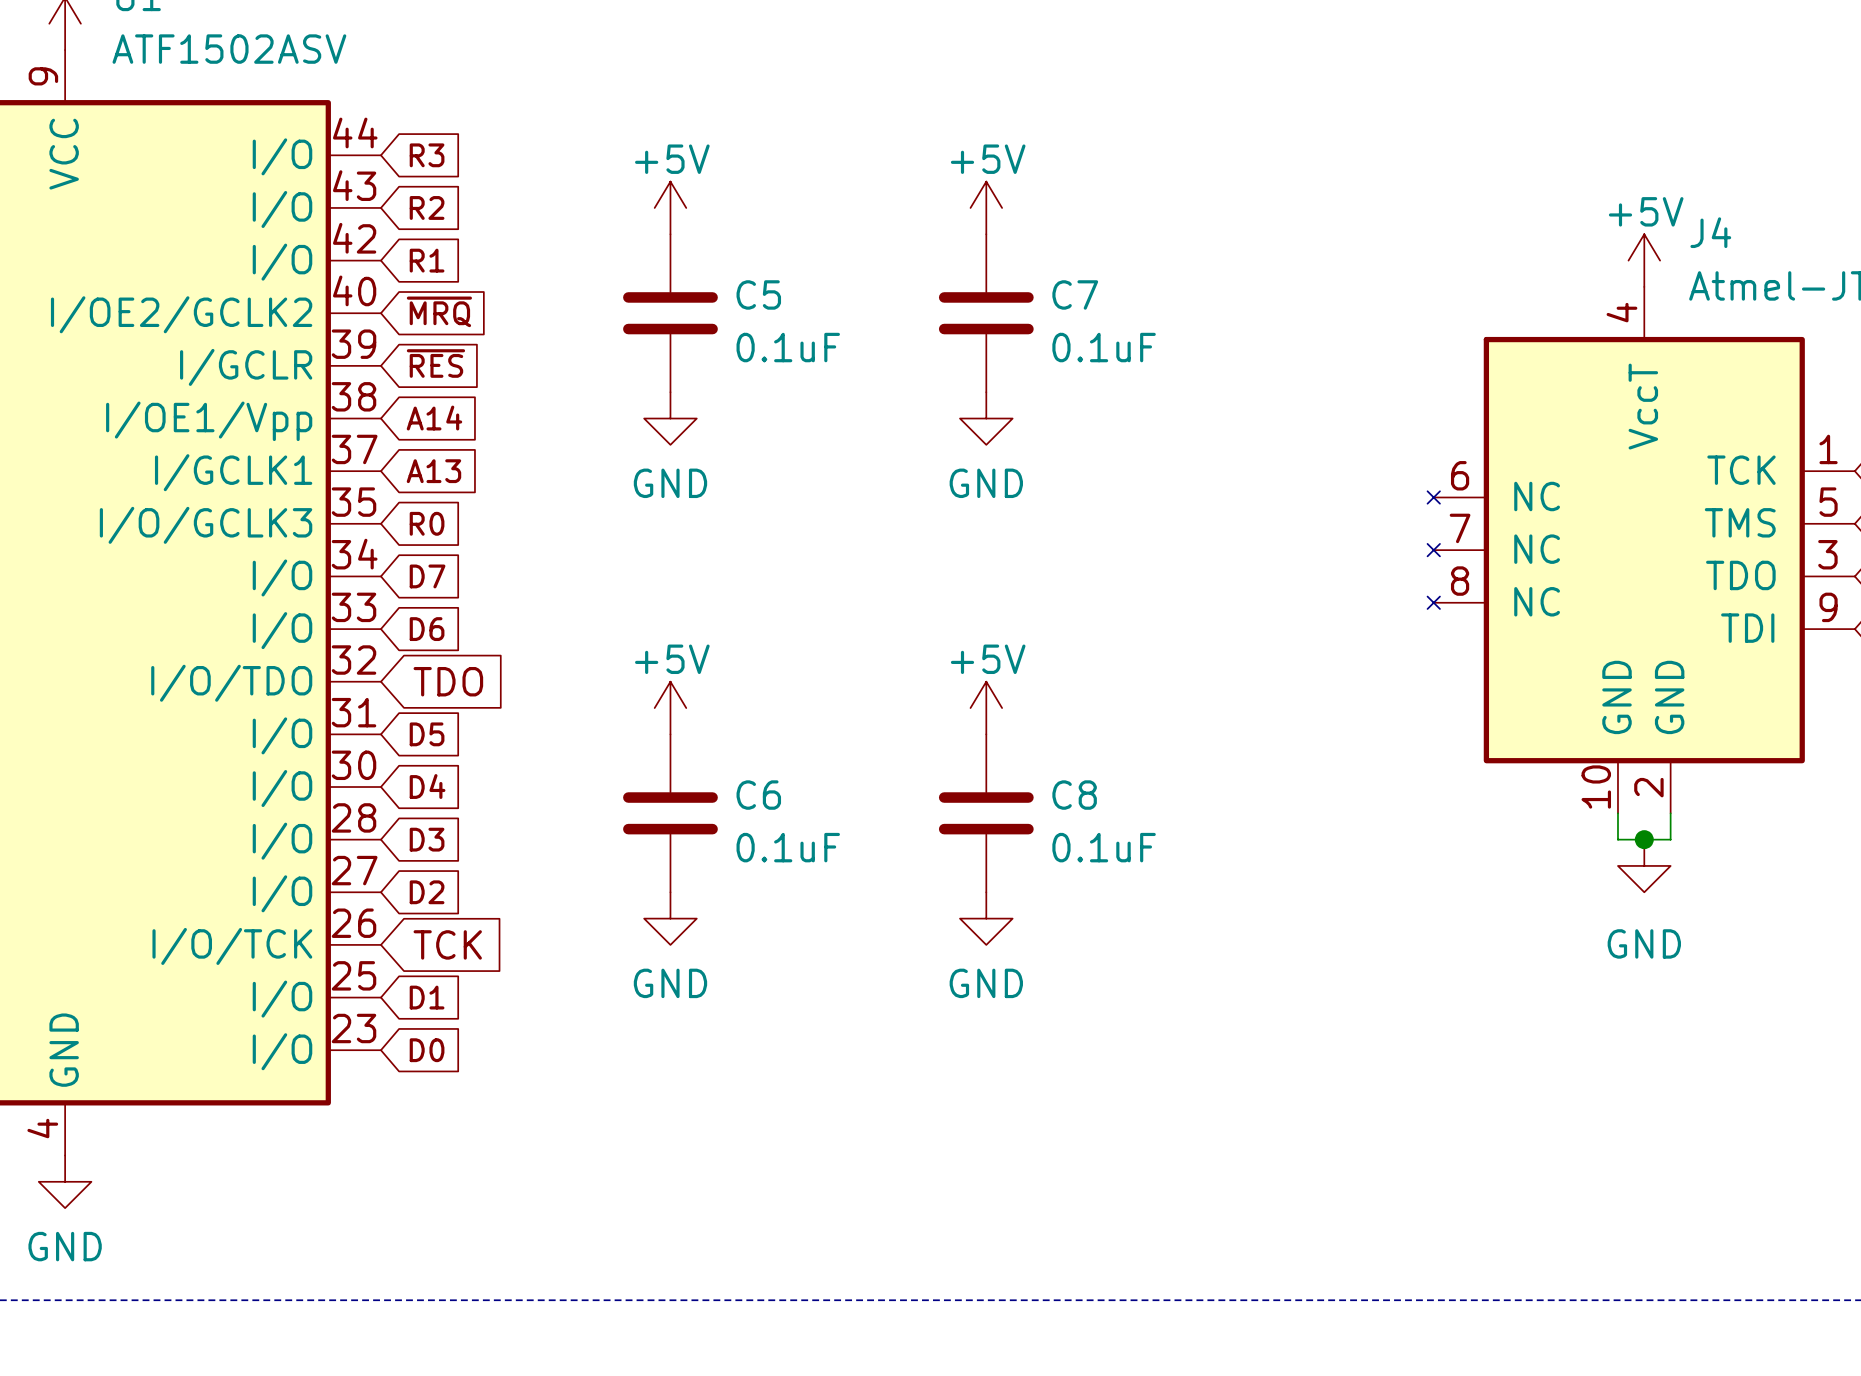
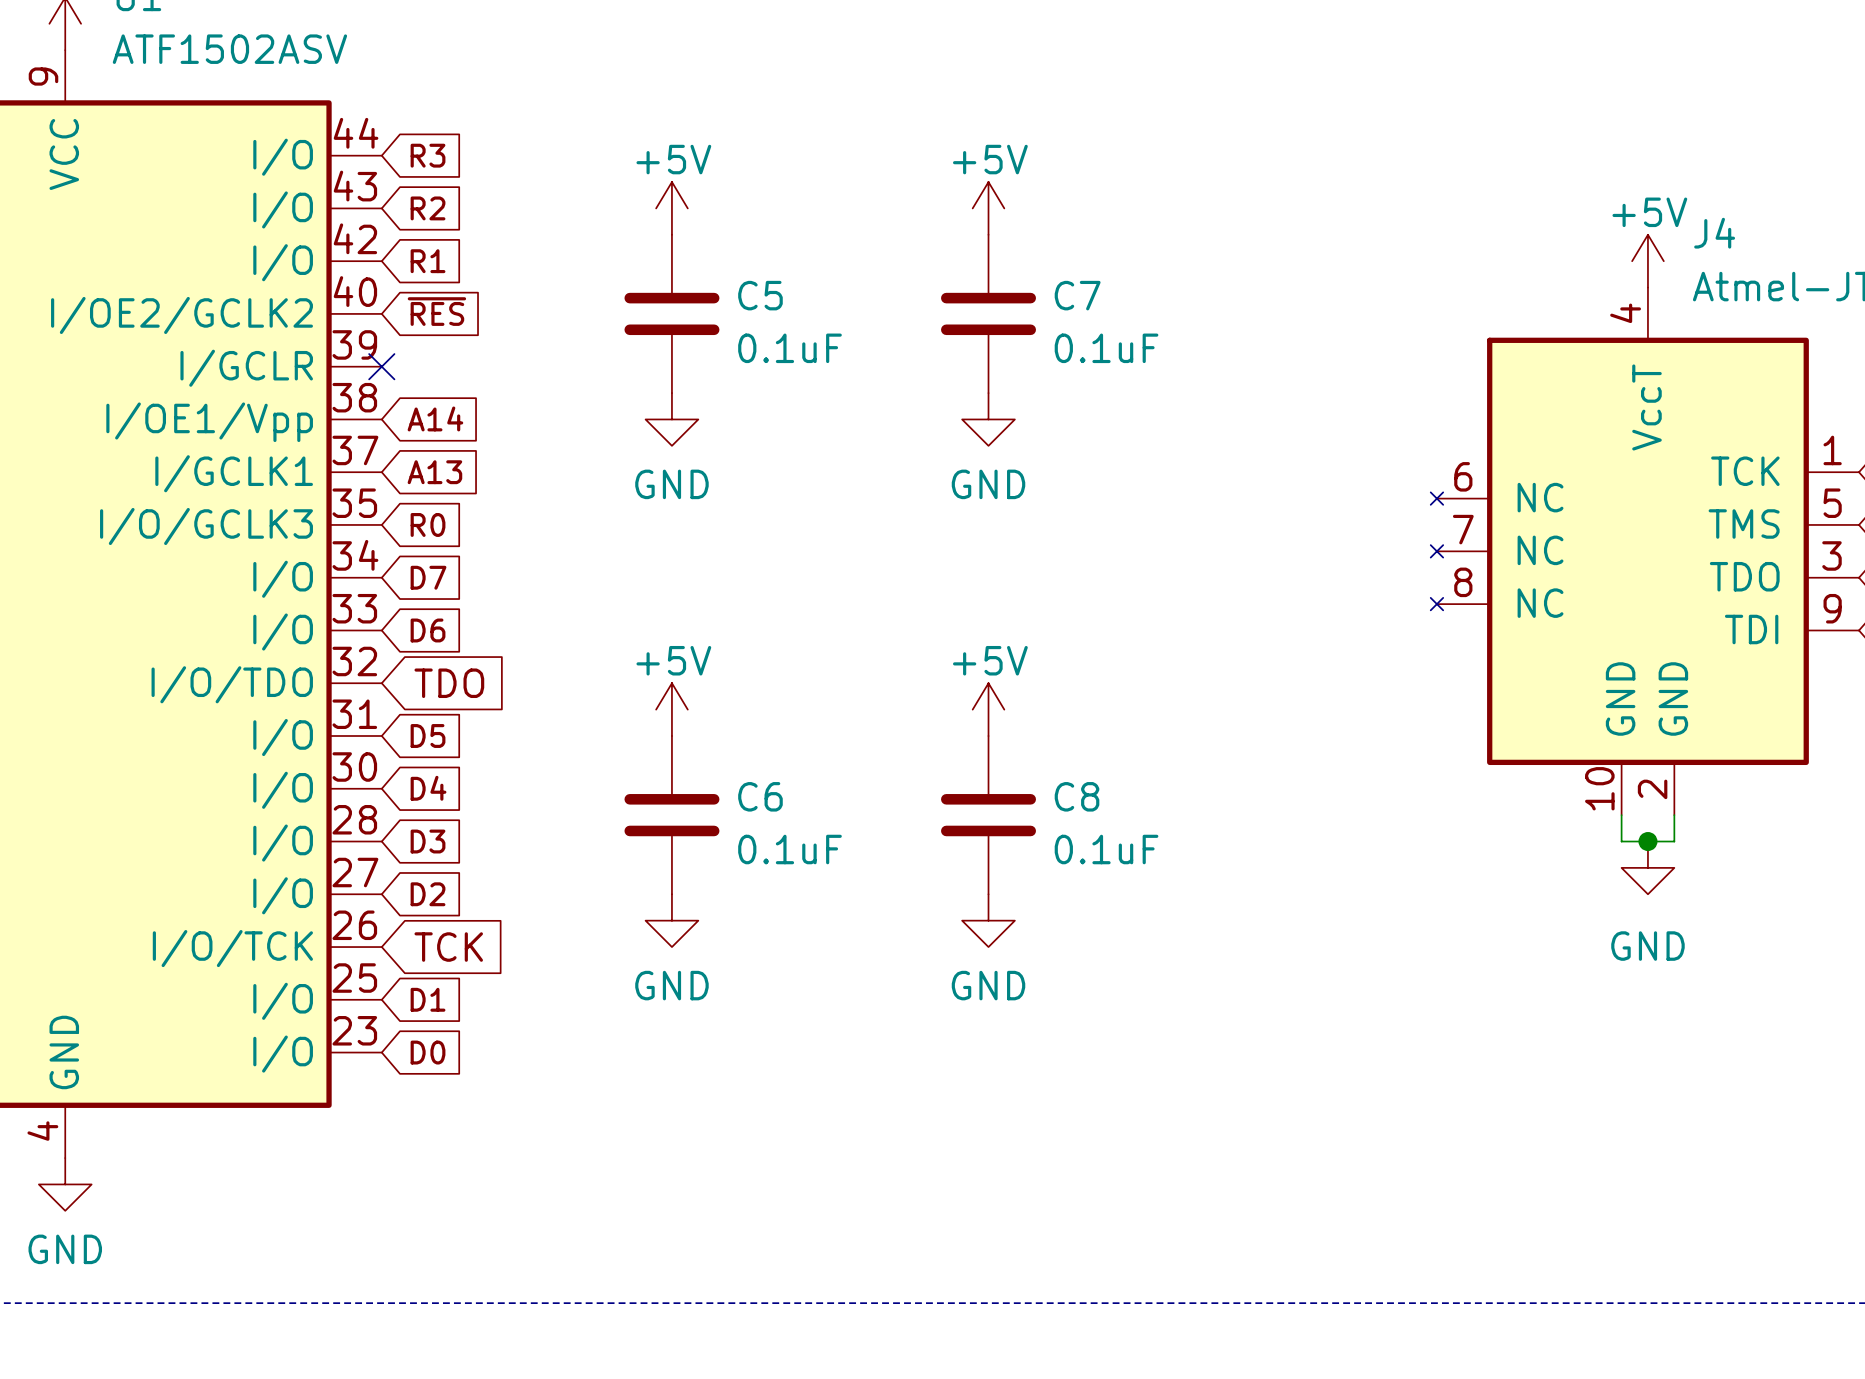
global label: ~{MRQ} (439, 311) -> ~{RES} (436, 311)
global label: ~{RES} (435, 363) -> none
no-connect mark: none -> (381, 366)

